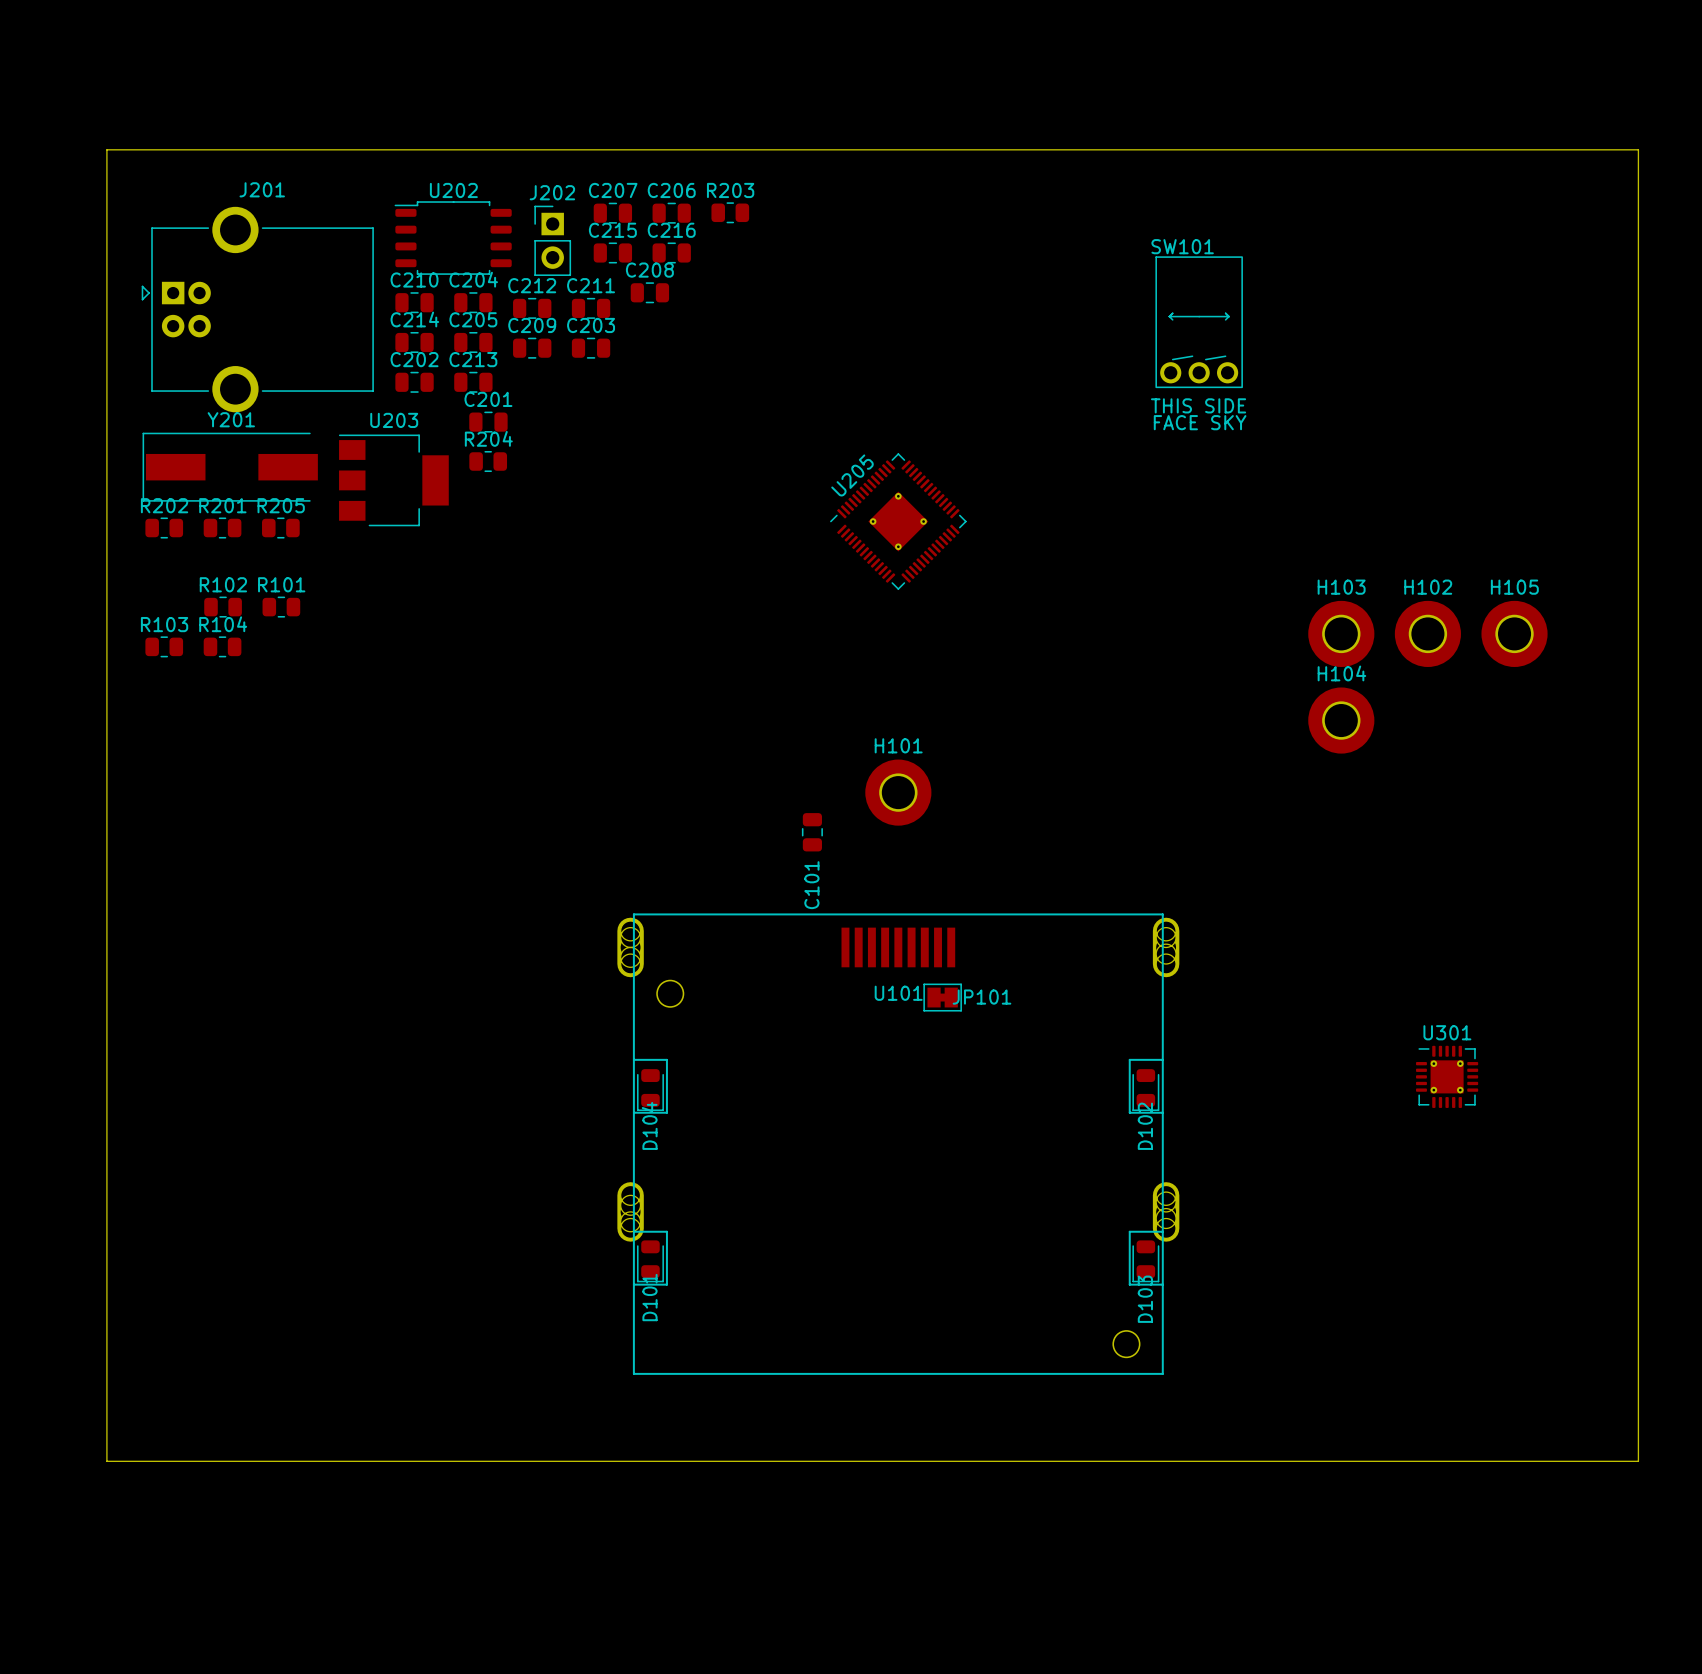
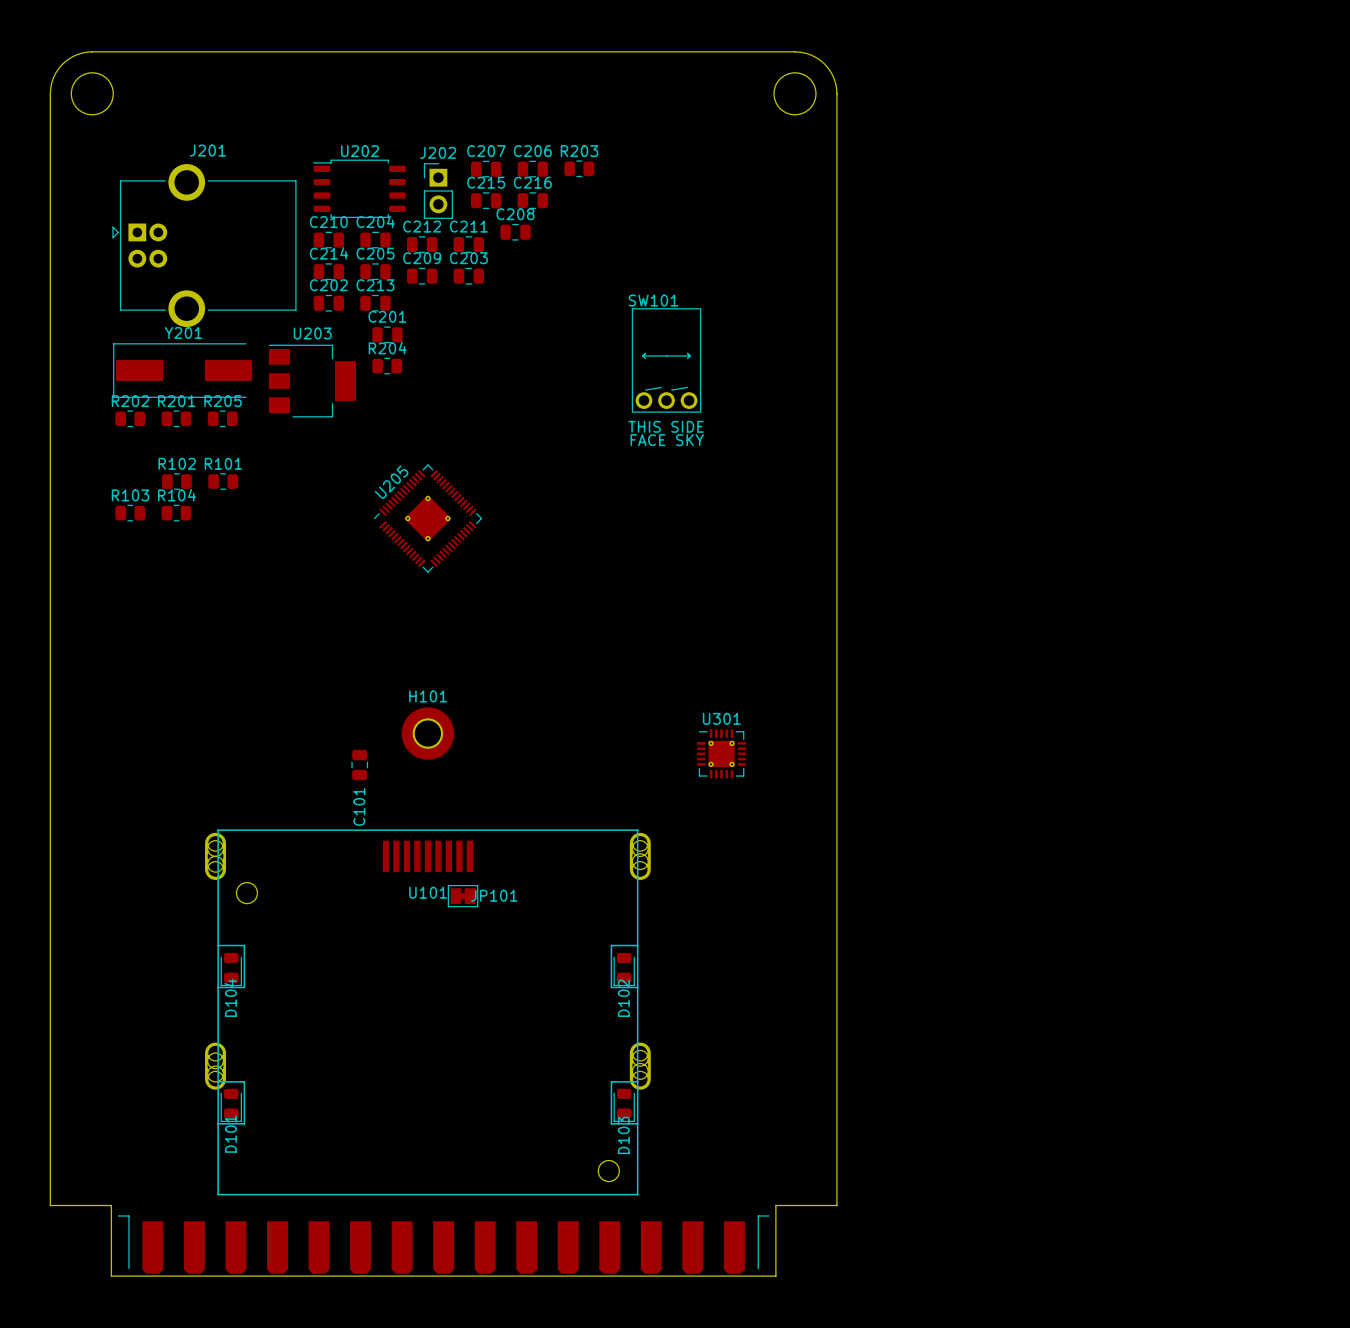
board edge: (106, 149) (1638, 149) (1638, 1461) (106, 1461) (106, 149) -> none
SW101 position: (1199, 322) -> (666, 360)
U205 position: (898, 521) -> (427, 518)
H103: (1341, 633) -> none
H102: (1427, 633) -> none
H105: (1514, 633) -> none
H104: (1341, 720) -> none
H101 position: (898, 792) -> (427, 733)
C101 position: (812, 832) -> (359, 765)
part: none -> (443, 663)
JP101 position: (942, 997) -> (463, 896)
U301 position: (1447, 1076) -> (721, 753)
D104 position: (650, 1090) -> (231, 969)
D102 position: (1145, 1090) -> (624, 969)
U101 position: (898, 1144) -> (427, 1012)
D101 position: (650, 1261) -> (231, 1105)
D103 position: (1145, 1261) -> (624, 1105)

